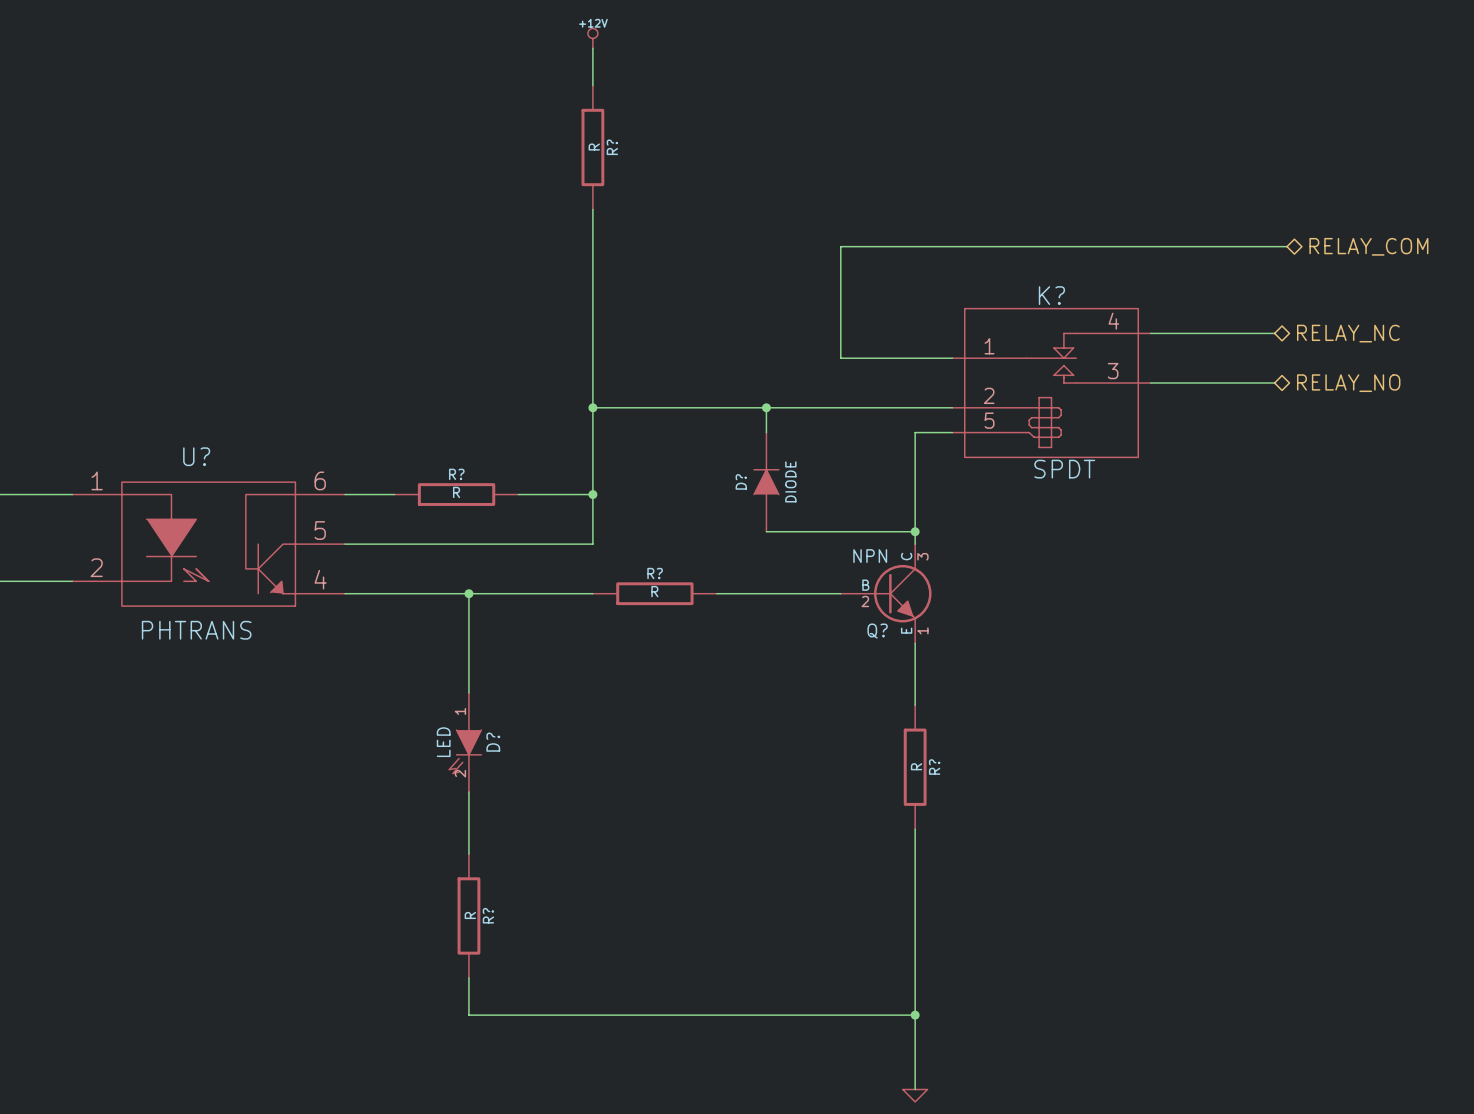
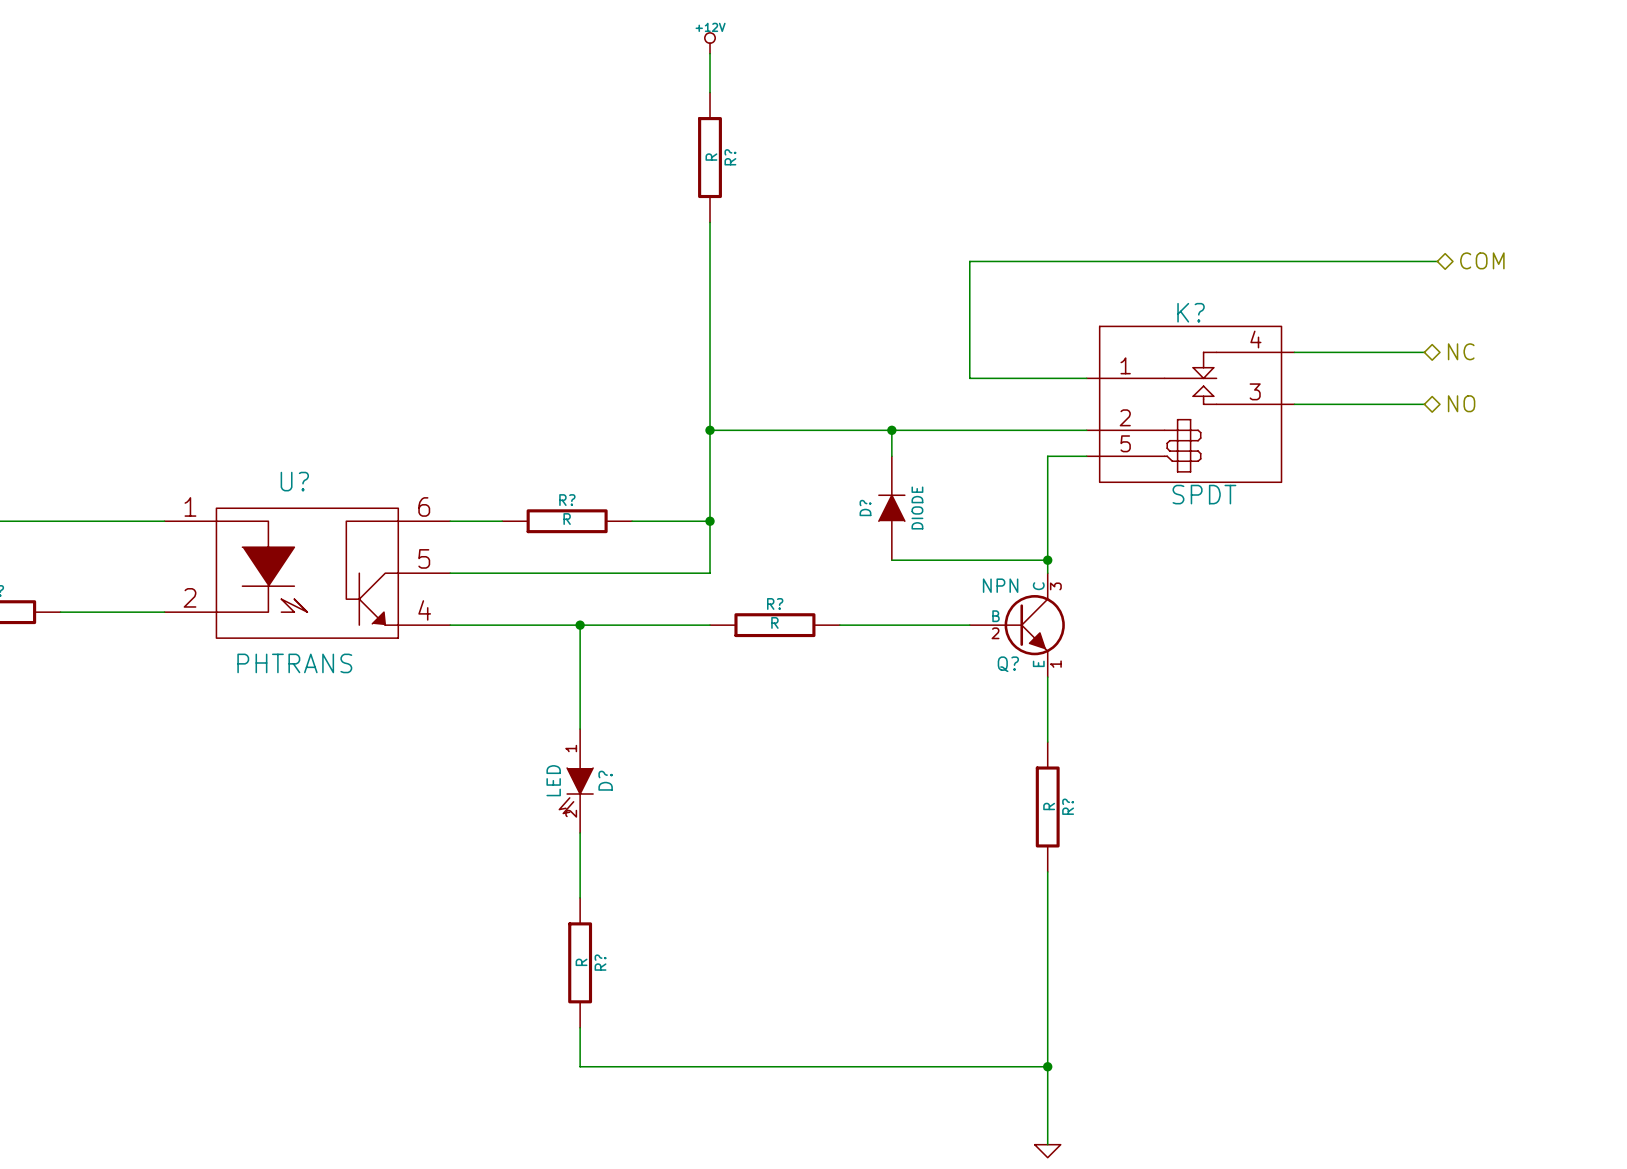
hierarchical label: RELAY_COM (1368, 246) -> COM (1482, 260)
hierarchical label: RELAY_NC (1348, 333) -> NC (1461, 351)
hierarchical label: RELAY_NO (1348, 383) -> NO (1461, 403)

